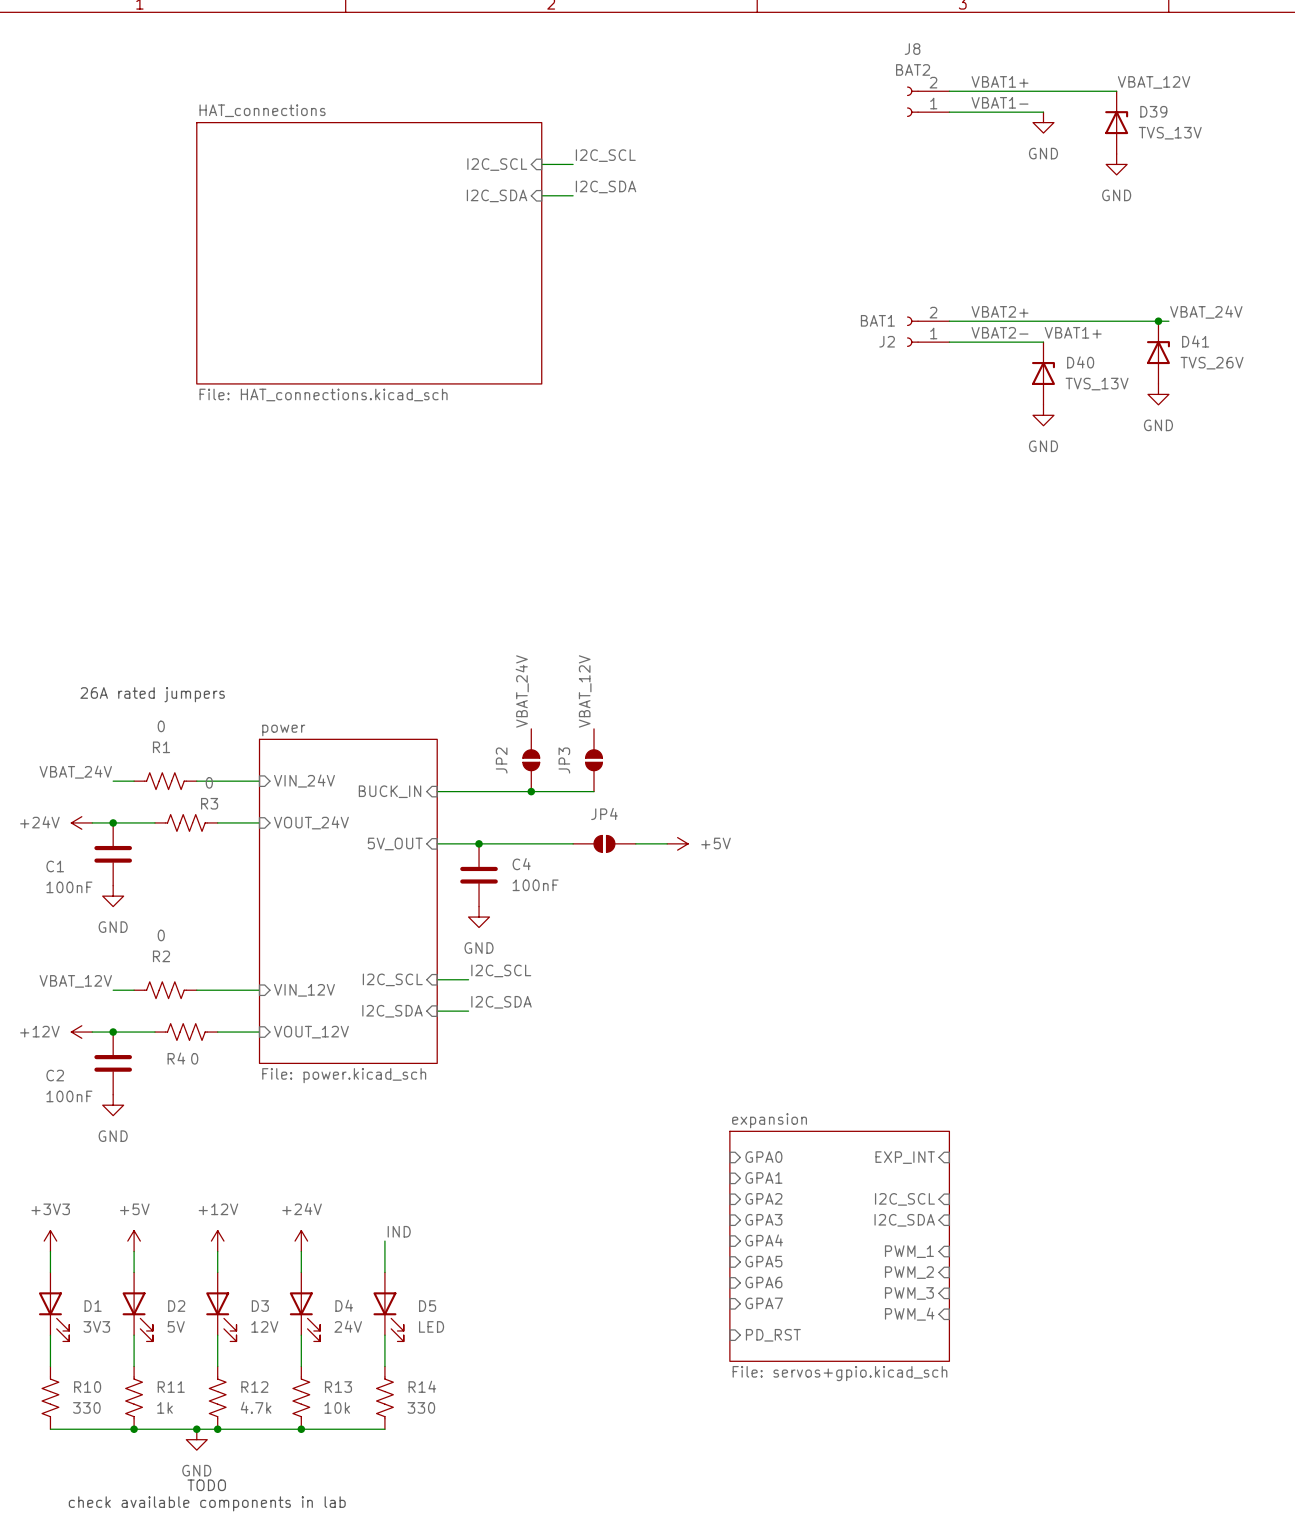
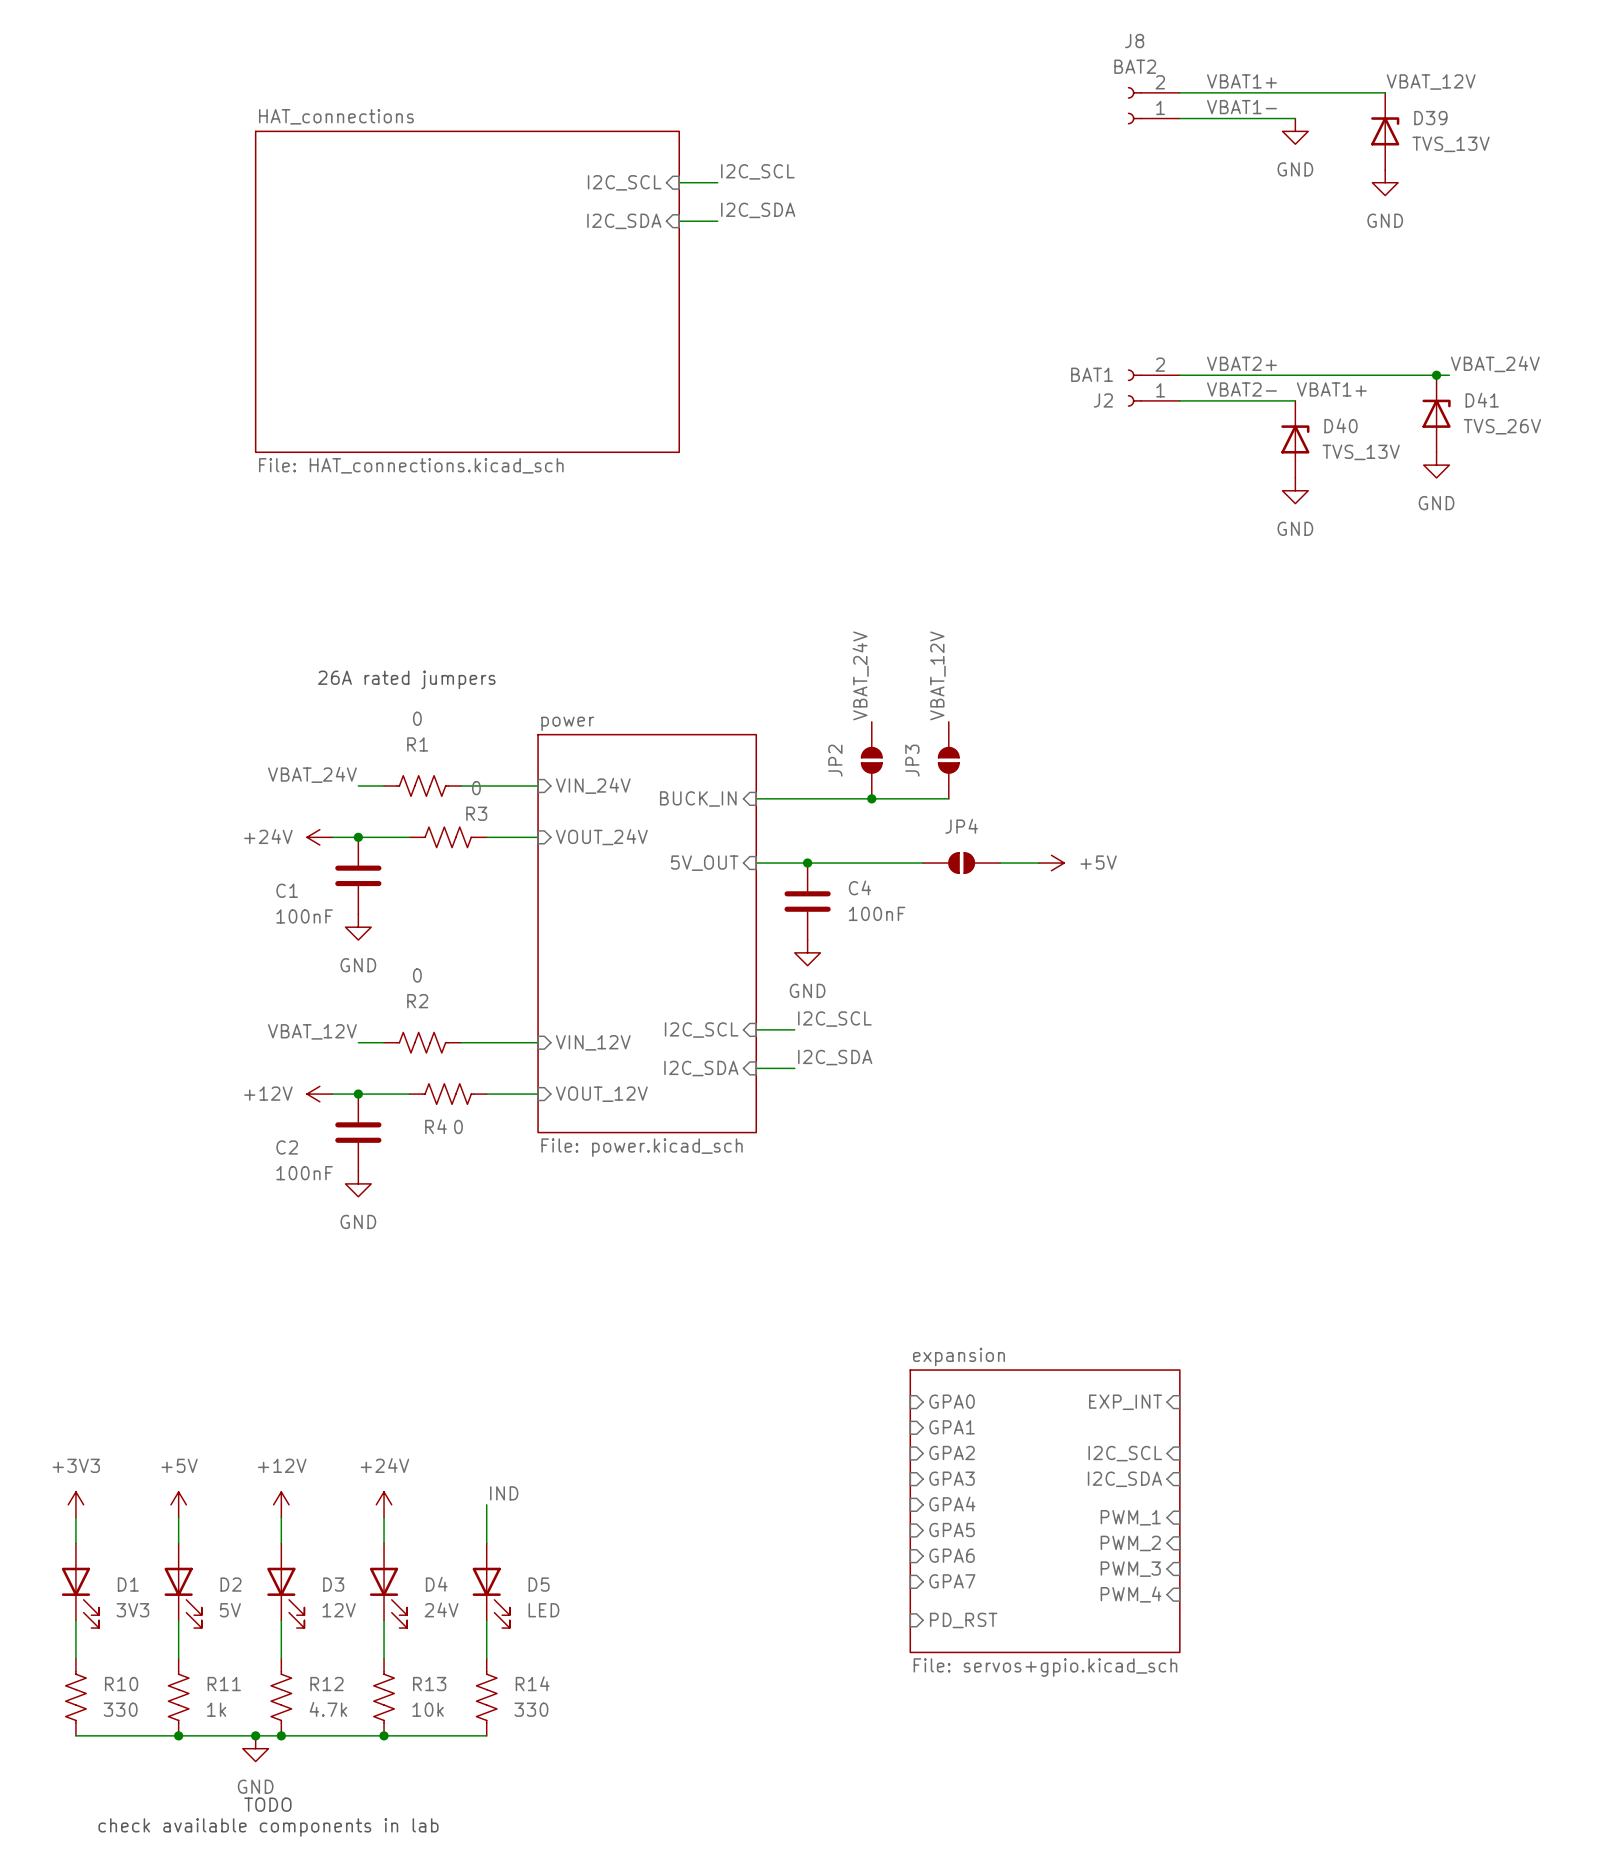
label: none -> VBAT_24V (860, 675)
label: none -> VBAT_12V (937, 675)
text: none -> 26A rated jumpers (406, 679)
label: none -> VBAT_24V (312, 774)
wire: none -> (358, 786) (384, 786)
wire: none -> (461, 786) (538, 786)
sheet pin: none -> VIN_24V (593, 785)
sheet pin: none -> BUCK_IN (698, 798)
wire: none -> (756, 798) (948, 798)
junction: none -> (871, 798)
label: VBAT_24V (522, 691) -> none
label: VBAT_12V (585, 691) -> none
text: 26A rated jumpers (152, 694) -> none
power symbol: none -> +24V (319, 837)
wire: none -> (332, 837) (409, 837)
junction: none -> (358, 837)
wire: none -> (486, 837) (538, 837)
sheet pin: none -> VOUT_24V (601, 837)
sheet pin: none -> 5V_OUT (704, 863)
wire: none -> (756, 863) (923, 863)
junction: none -> (807, 863)
wire: none -> (1000, 863) (1038, 863)
power symbol: none -> +5V (1051, 863)
JP2 position: (531, 760) -> (871, 760)
JP3 position: (594, 760) -> (948, 760)
power symbol: none -> GND (358, 927)
label: VBAT_24V (75, 772) -> none
sheet power: none -> File: power.kicad_sch (647, 933)
wire: (113, 781) (134, 781) -> (358, 1042) (384, 1042)
R1 position: (165, 781) -> (422, 786)
wire: (196, 781) (259, 781) -> (461, 1042) (538, 1042)
sheet pin: VIN_24V (304, 781) -> none
sheet pin: BUCK_IN (390, 791) -> none
wire: (437, 791) (594, 791) -> none
junction: (531, 791) -> none
power symbol: none -> GND (807, 952)
power symbol: +24V (81, 822) -> none
wire: (92, 822) (154, 822) -> (332, 1094) (409, 1094)
junction: (113, 822) -> none
R3 position: (186, 822) -> (448, 837)
wire: (217, 822) (259, 822) -> (486, 1094) (538, 1094)
sheet pin: VOUT_24V (311, 822) -> none
sheet pin: 5V_OUT (395, 843) -> none
wire: (437, 843) (573, 843) -> none
junction: (479, 843) -> none
JP4 position: (604, 843) -> (961, 863)
wire: (635, 843) (667, 843) -> (756, 1029) (794, 1029)
power symbol: +5V (677, 843) -> none
label: none -> I2C_SCL (834, 1019)
C1 position: (113, 854) -> (358, 875)
sheet pin: none -> I2C_SCL (701, 1030)
label: none -> VBAT_12V (312, 1031)
sheet pin: none -> VIN_12V (593, 1042)
C4 position: (479, 875) -> (807, 901)
label: none -> I2C_SDA (835, 1057)
sheet pin: none -> I2C_SDA (701, 1068)
power symbol: GND (113, 896) -> none
sheet power: File: power.kicad_sch (348, 901) -> none
power symbol: none -> +12V (319, 1094)
junction: none -> (358, 1094)
sheet pin: none -> VOUT_12V (601, 1094)
power symbol: GND (479, 917) -> none
label: I2C_SCL (501, 970) -> none
power symbol: none -> GND (358, 1183)
sheet pin: I2C_SCL (392, 979) -> none
wire: (437, 979) (468, 979) -> (756, 1068) (794, 1068)
label: VBAT_12V (75, 981) -> none
wire: (113, 990) (134, 990) -> none
R2 position: (165, 990) -> (422, 1042)
wire: (196, 990) (259, 990) -> none
sheet pin: VIN_12V (304, 990) -> none
label: I2C_SDA (501, 1002) -> none
sheet pin: I2C_SDA (392, 1011) -> none
wire: (437, 1011) (468, 1011) -> none
power symbol: +12V (81, 1032) -> none
wire: (92, 1032) (154, 1032) -> none
junction: (113, 1032) -> none
R4 position: (186, 1032) -> (448, 1094)
wire: (217, 1032) (259, 1032) -> none
sheet pin: VOUT_12V (311, 1032) -> none
C2 position: (113, 1063) -> (358, 1132)
power symbol: GND (113, 1105) -> none

